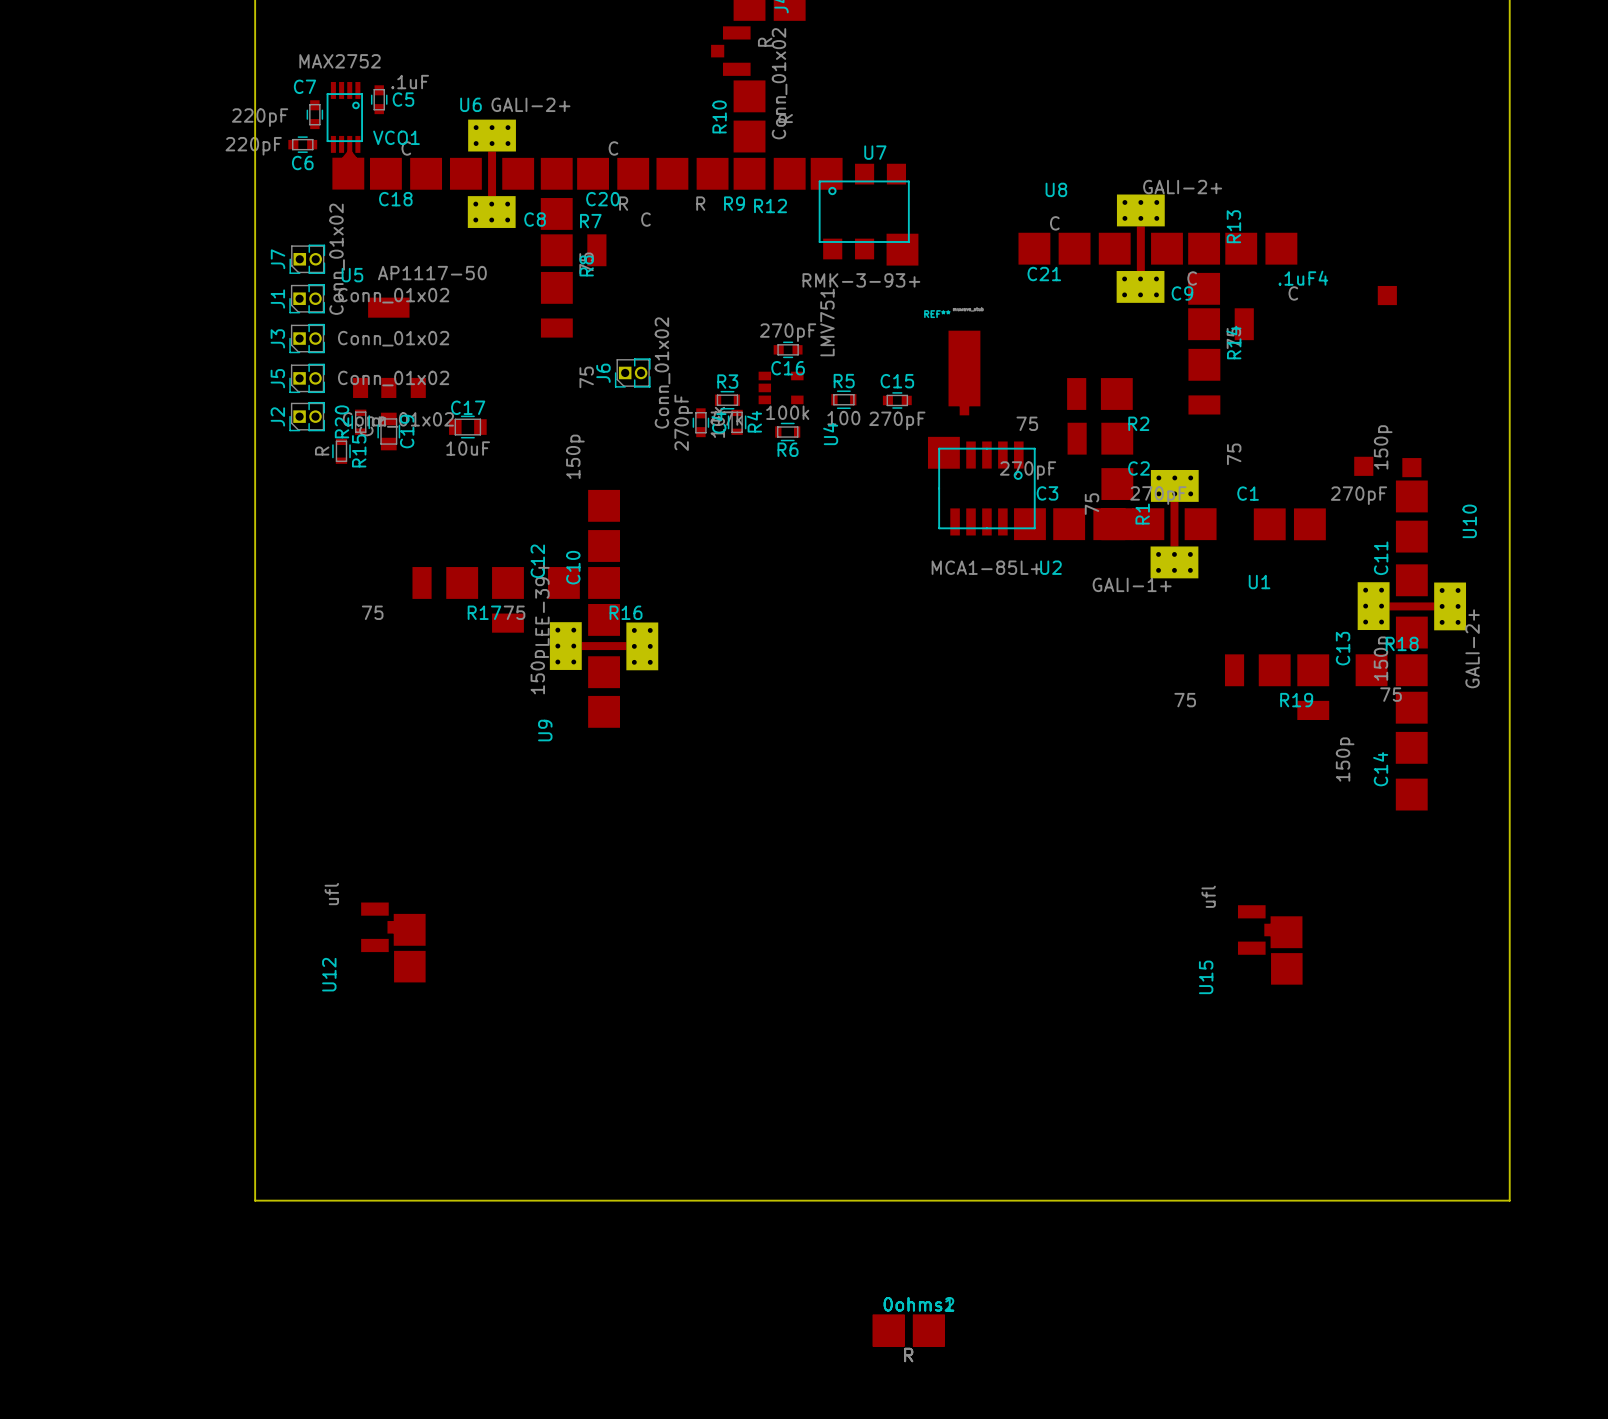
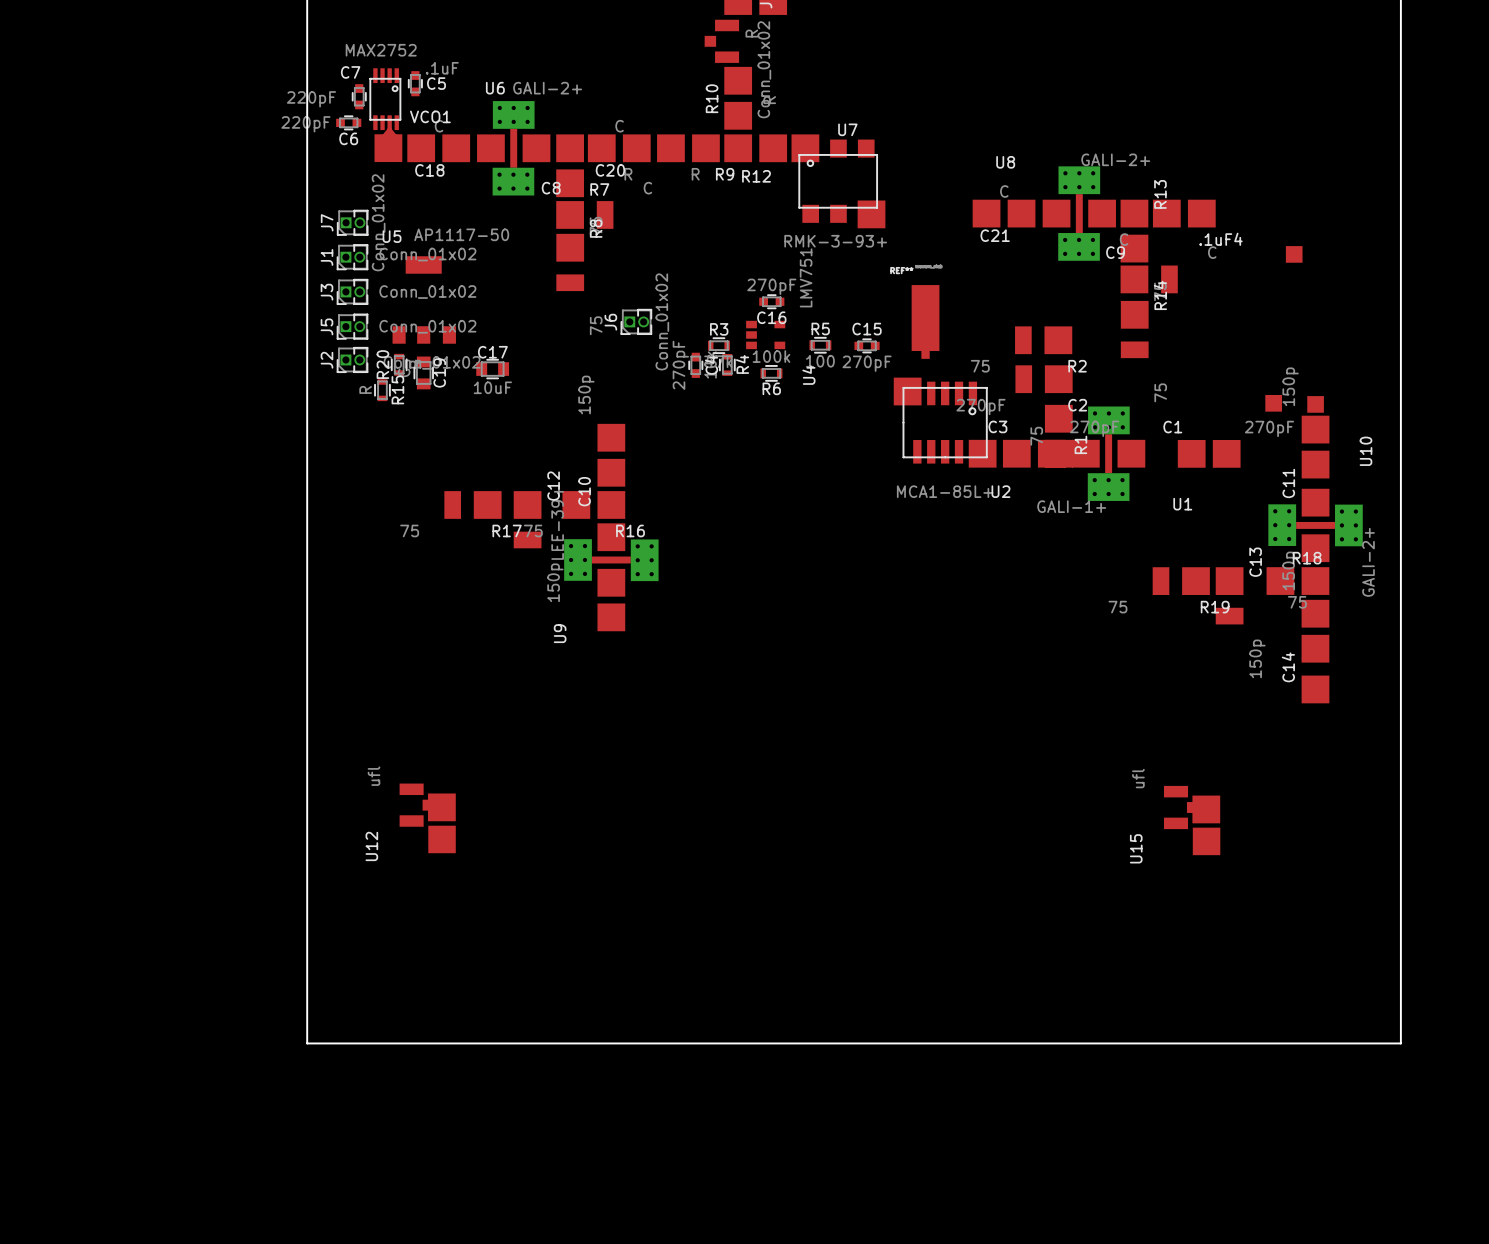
part: R (908, 1330) -> none
part: R (908, 1330) -> none

